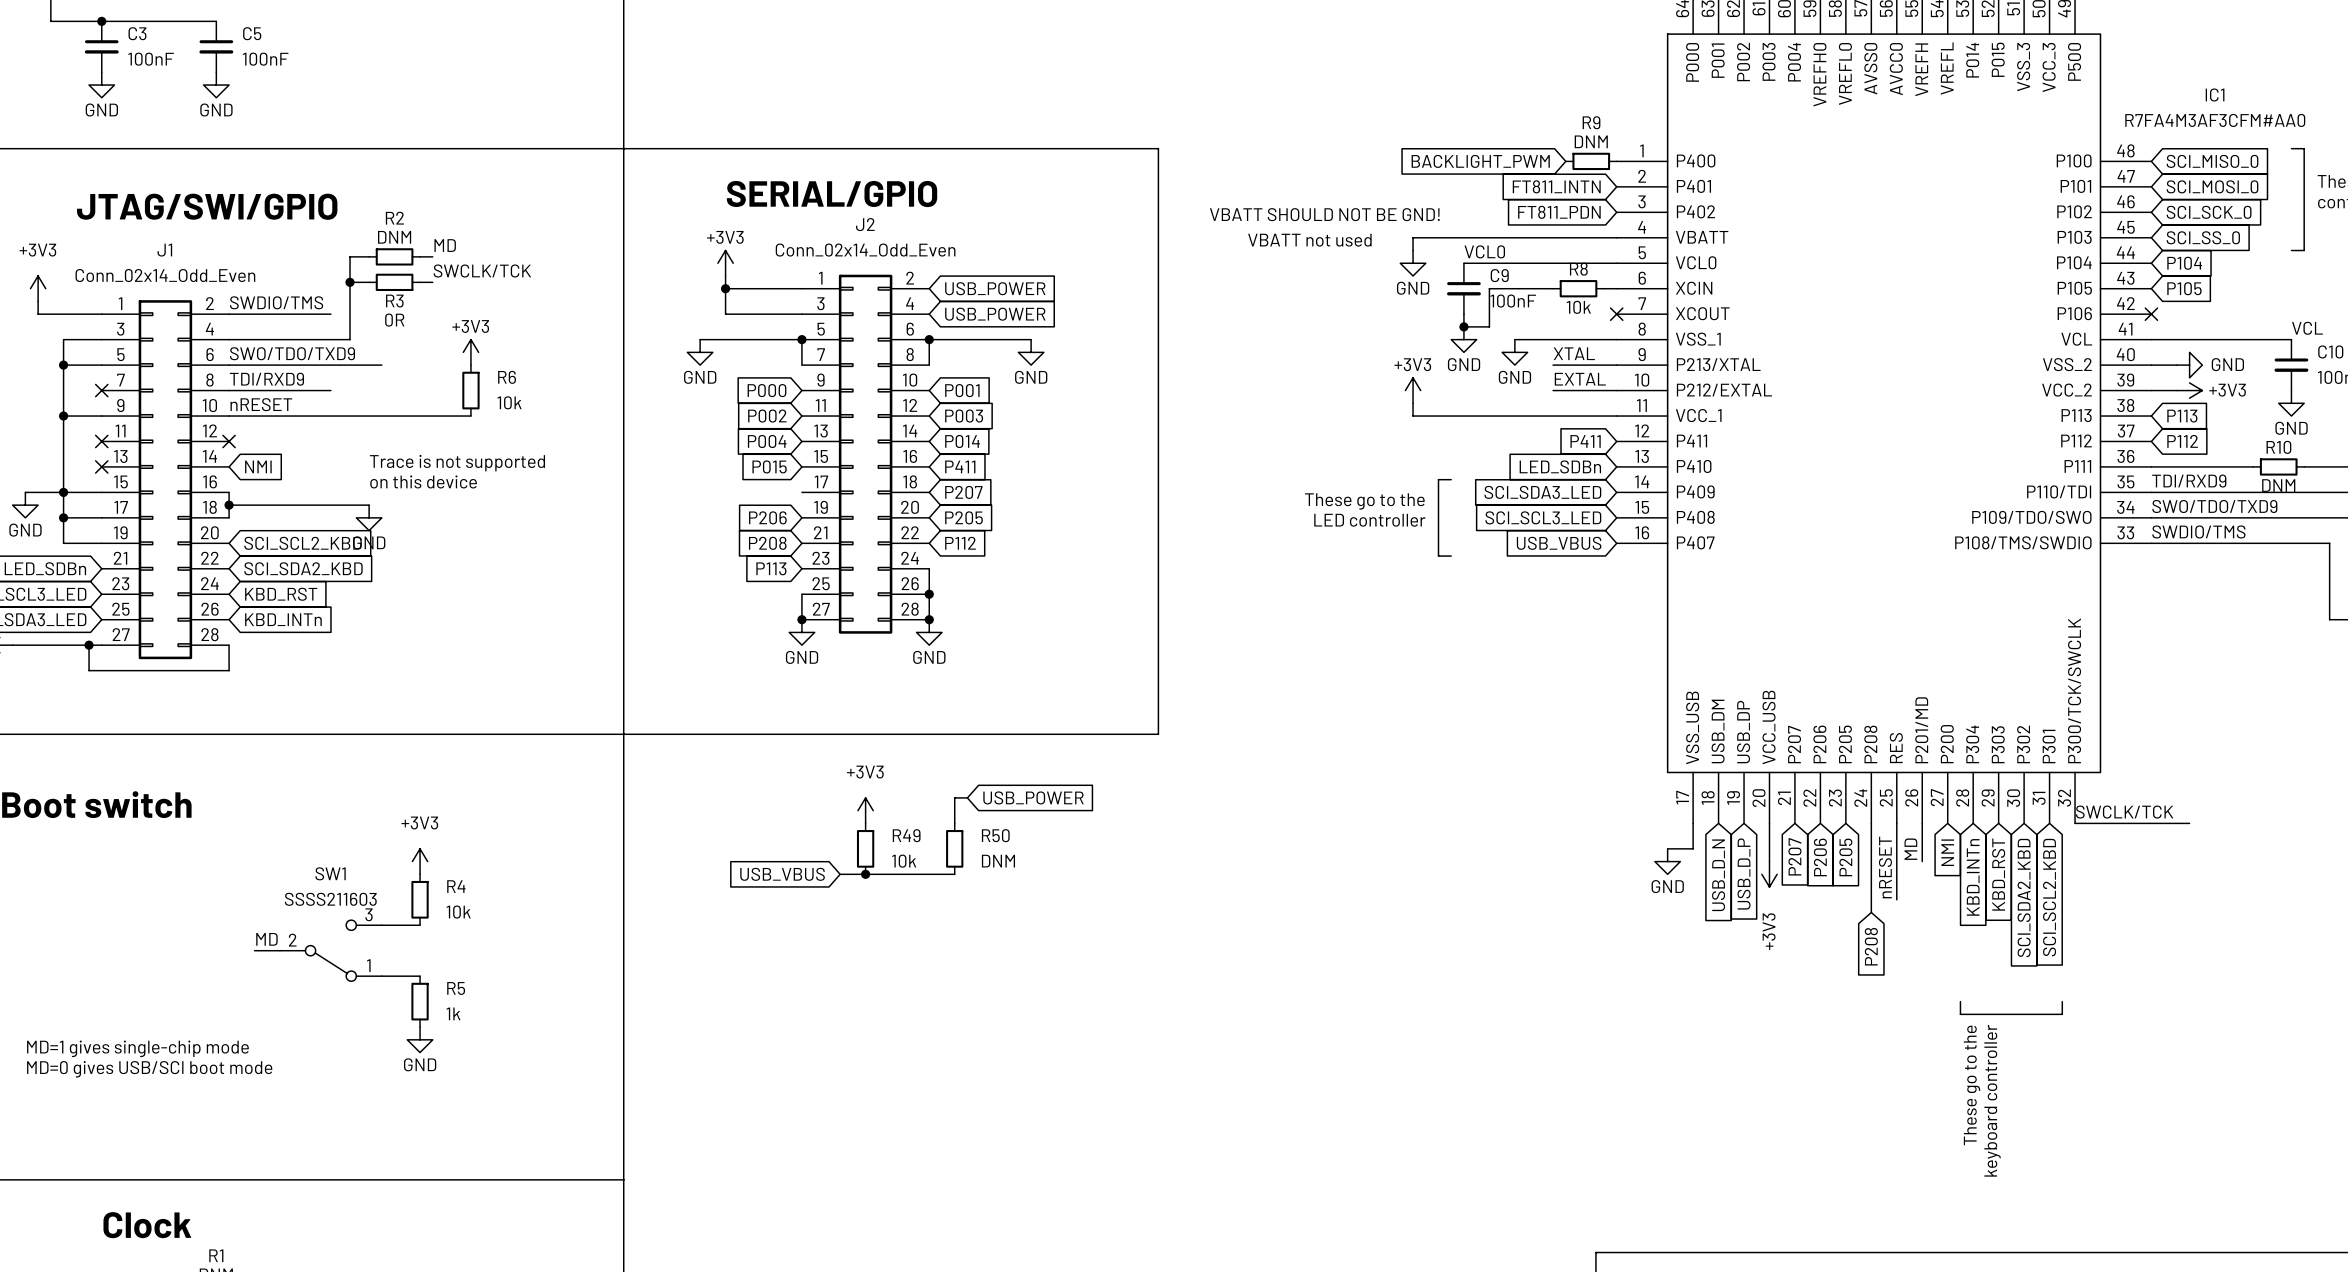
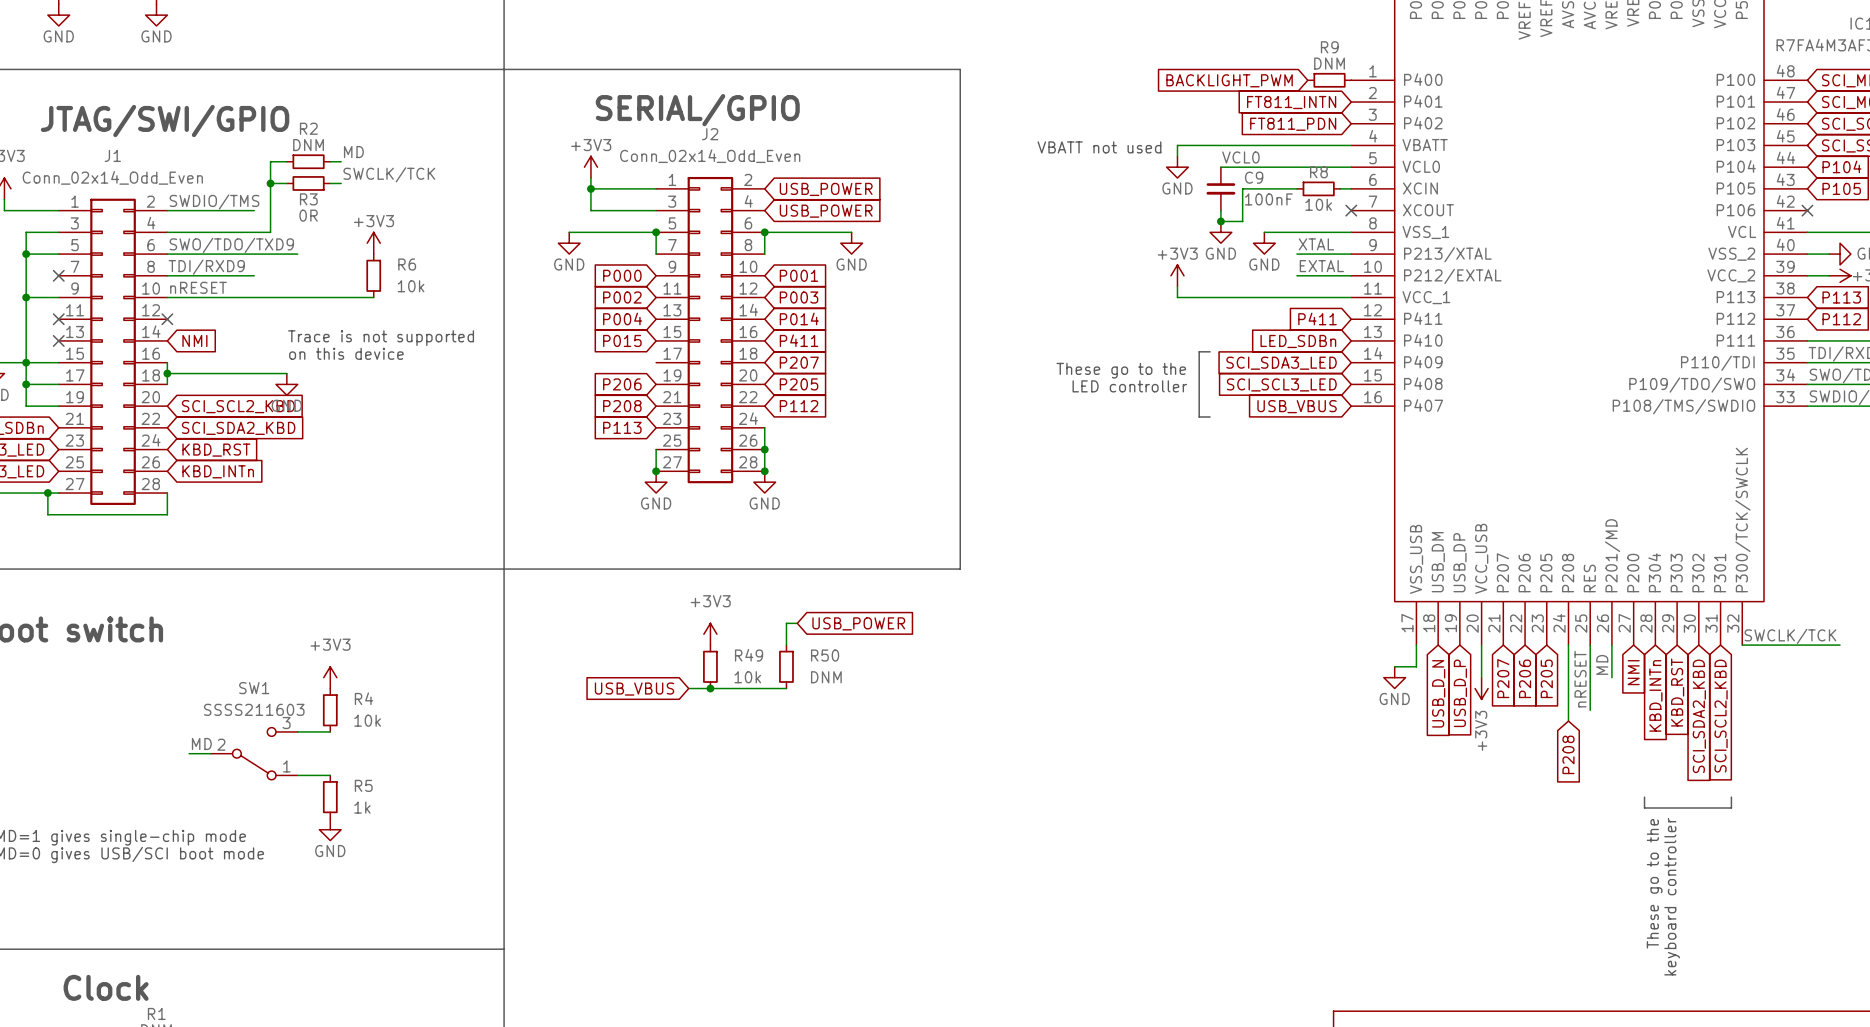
text: VBATT SHOULD NOT BE GND! (1324, 214) -> none

